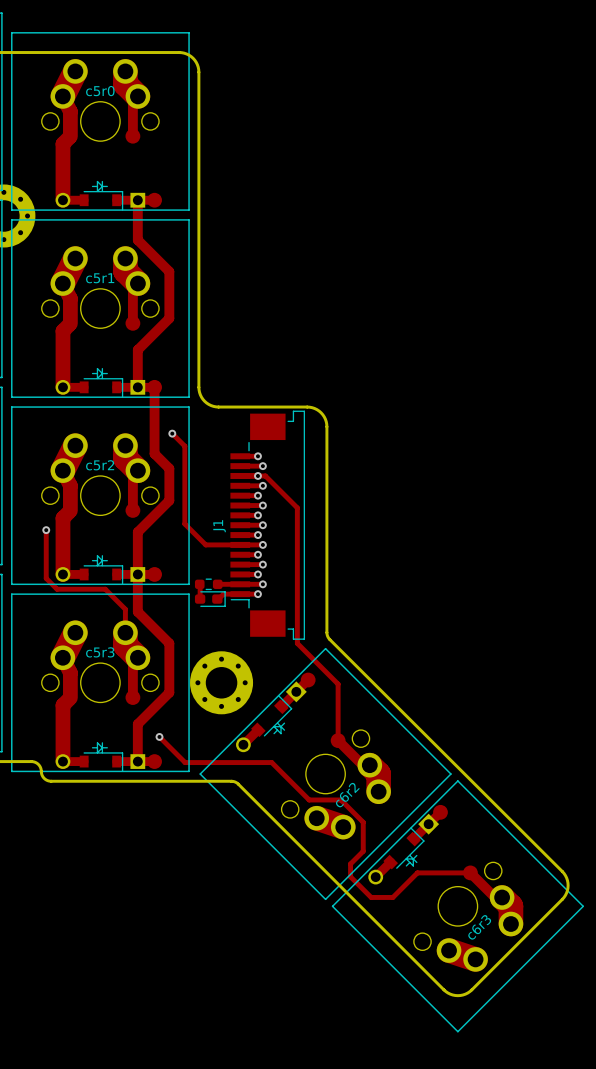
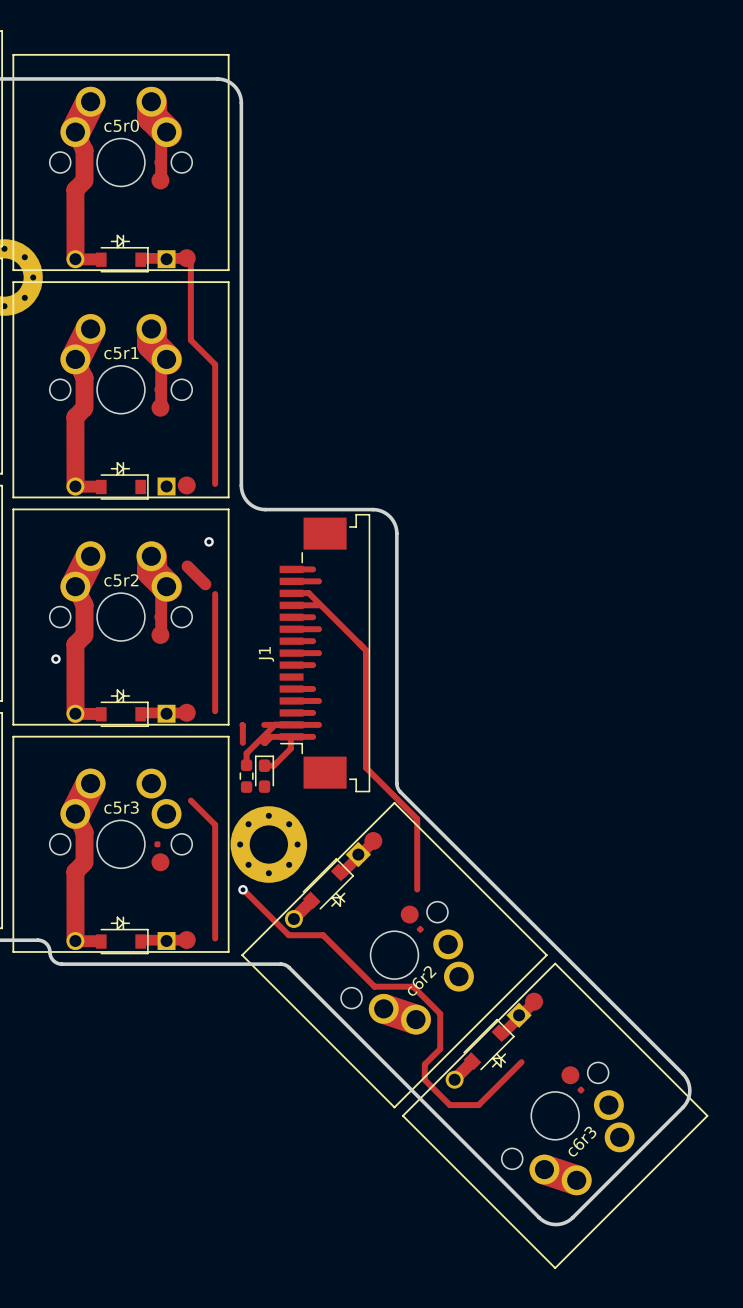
c5r0 footprint: [11, 32, 190, 211] -> [12, 53, 230, 273]
track: (137, 200) (137, 240) (169, 271) (169, 318) (137, 349) (137, 387) -> none
track: none -> (190, 259) (190, 340) (215, 364) (215, 483)
c5r1 footprint: [11, 219, 190, 398] -> [12, 281, 230, 500]
track: (116, 387) (154, 387) (154, 453) -> none
c5r2 footprint: [11, 406, 190, 586] -> [12, 508, 230, 727]
track: (172, 433) (184, 446) (184, 523) (205, 544) (262, 544) -> none
via: (257, 456) -> none
via: (262, 466) -> none
track: (169, 468) (169, 500) (137, 532) (137, 611) (169, 643) (169, 692) (137, 724) (137, 761) -> none
track: none -> (290, 593) (308, 593) (365, 650) (365, 767) (417, 818) (417, 889)
track: (240, 475) (265, 475) (297, 507) (297, 643) (338, 684) (338, 740) (362, 765) (369, 765) (378, 774) (378, 791) -> none
via: (257, 475) -> none
track: none -> (215, 594) (215, 711)
via: (262, 485) -> none
via: (257, 495) -> none
via: (262, 505) -> none
via: (257, 515) -> none
via: (262, 525) -> none
track: (46, 530) (46, 578) (57, 589) (105, 589) (125, 609) (125, 645) (137, 657) (132, 662) (132, 697) -> none
via: (257, 535) -> none
via: (262, 544) -> none
via: (257, 554) -> none
via: (262, 564) -> none
via: (257, 574) -> none
part rotation: 0° (208, 584) -> 90° clockwise (246, 776)
part position: (208, 584) -> (246, 776)
track: none -> (290, 724) (275, 724) (246, 753) (246, 765)
via: (262, 584) -> none
c5r3 footprint: [11, 593, 190, 773] -> [12, 735, 230, 955]
track: none -> (290, 736) (290, 748) (273, 765) (264, 765)
via: (257, 594) -> none
part rotation: 0° (210, 599) -> 90° counterclockwise (264, 774)
part position: (210, 599) -> (264, 774)
track: none -> (190, 800) (215, 824) (215, 938)
c6r2 footprint: [199, 647, 452, 901] -> [241, 802, 548, 1109]
track: none -> (243, 889) (288, 935) (323, 935) (374, 986) (413, 986) (440, 1013) (440, 1048) (424, 1064) (424, 1079) (449, 1105) (478, 1105) (521, 1062)
track: (159, 736) (185, 762) (271, 762) (309, 799) (340, 799) (363, 822) (363, 851) (350, 863) (350, 876) (371, 897) (392, 897) (417, 872) (470, 872) (495, 897) (502, 897) (510, 906) (510, 924) -> none
via position: (159, 736) -> (243, 889)
c6r3 footprint: [331, 780, 584, 1033] -> [402, 962, 709, 1270]

